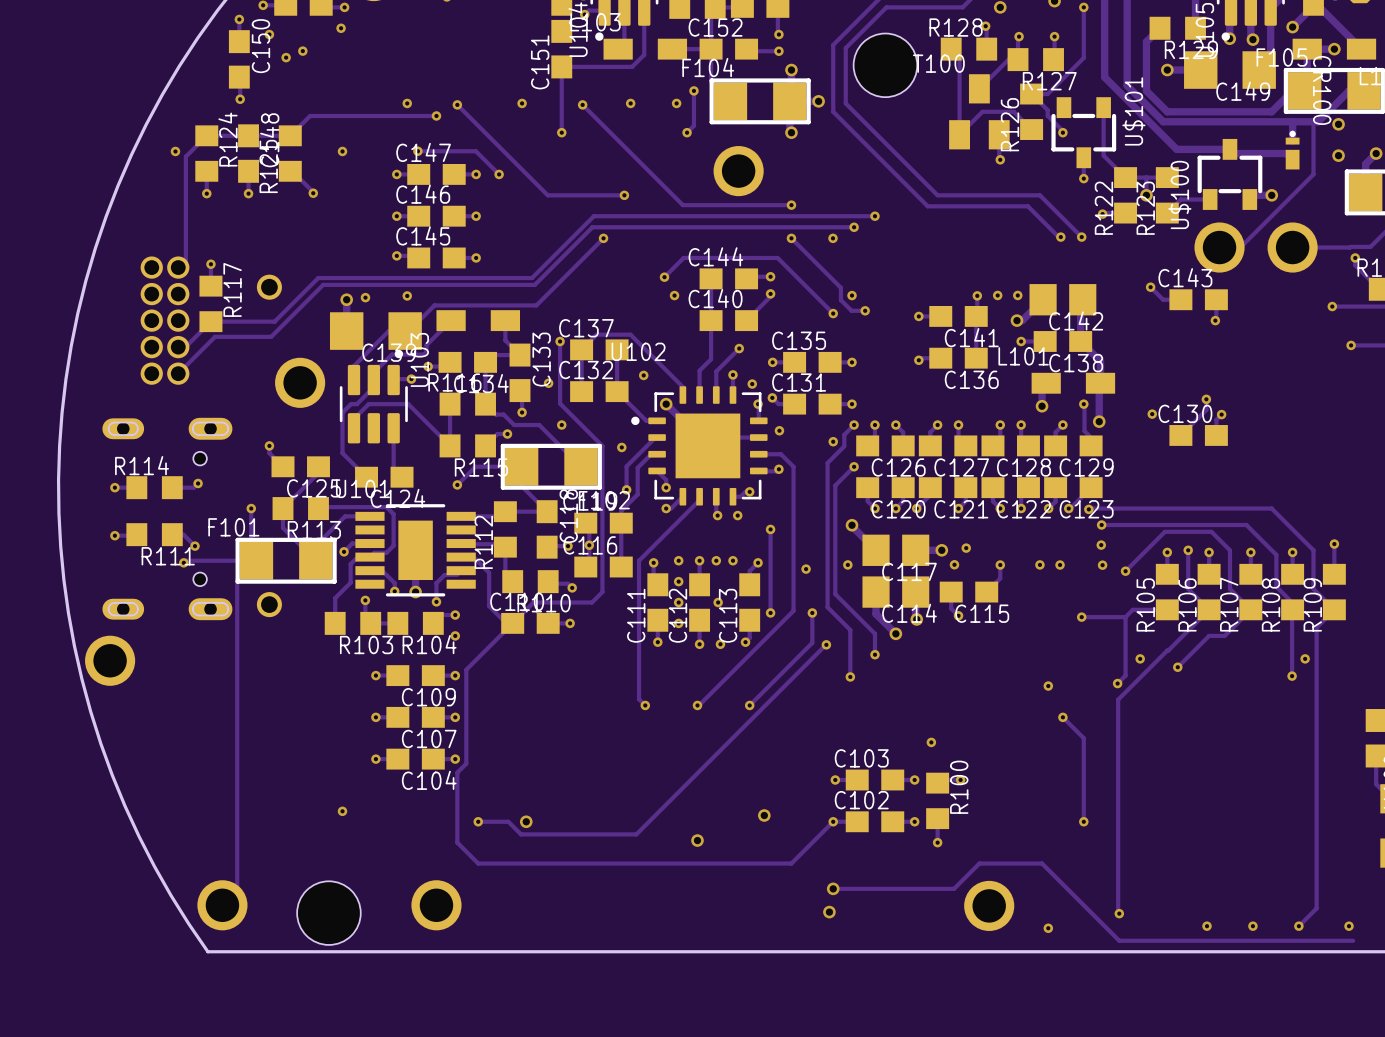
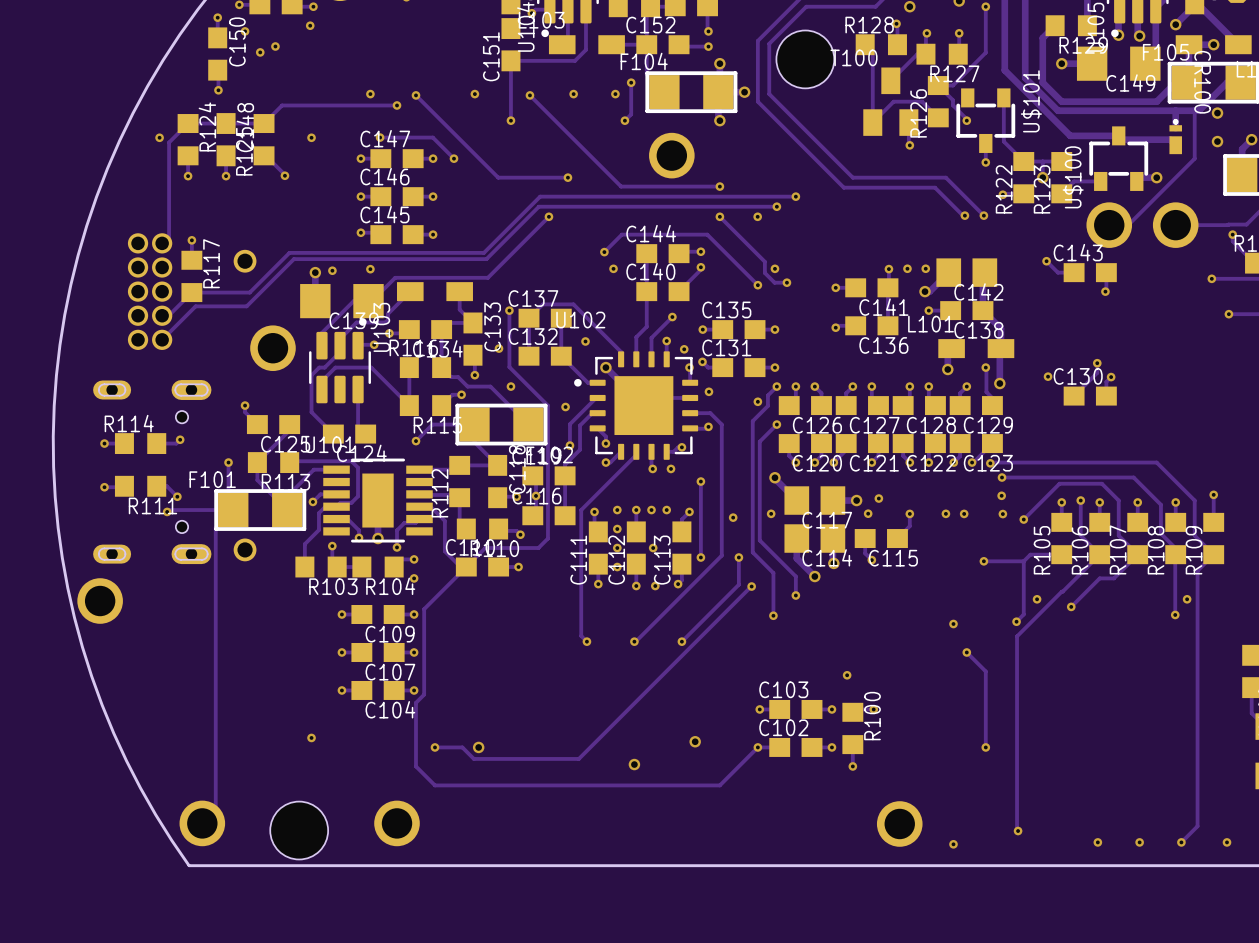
track: (833, 888) (954, 888) (979, 863) (1042, 863) (1119, 940) (1353, 940) -> none
via: (833, 888) -> none
via: (829, 912) -> none

